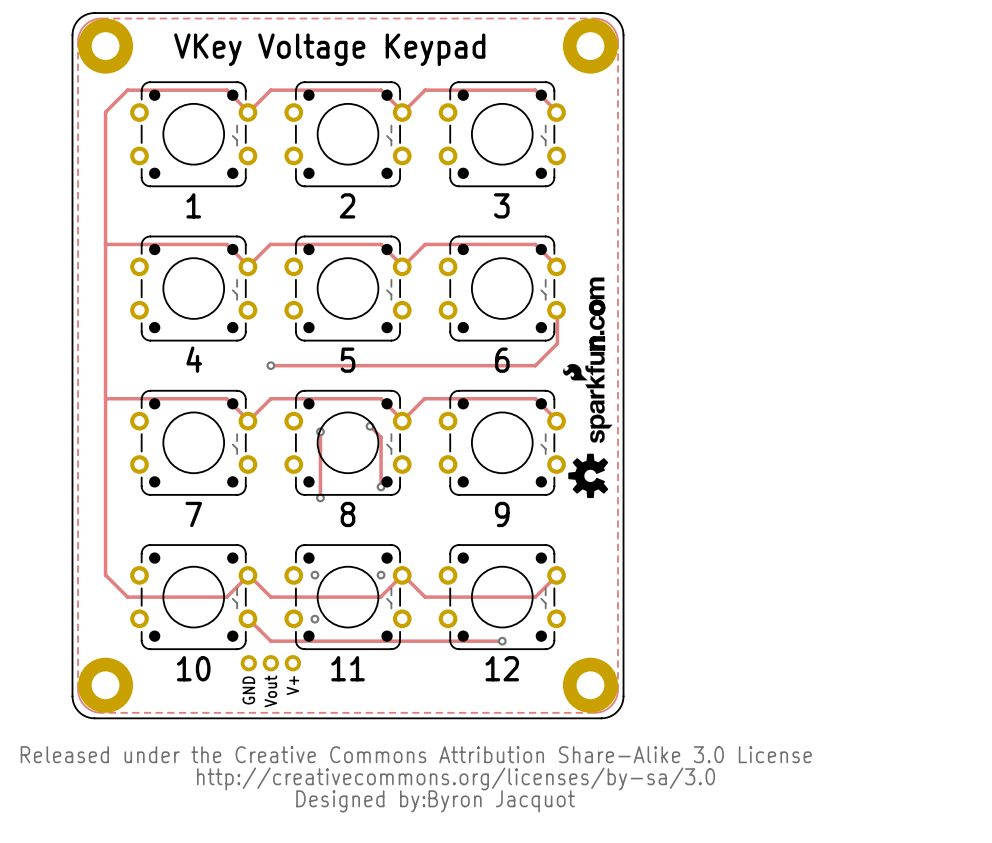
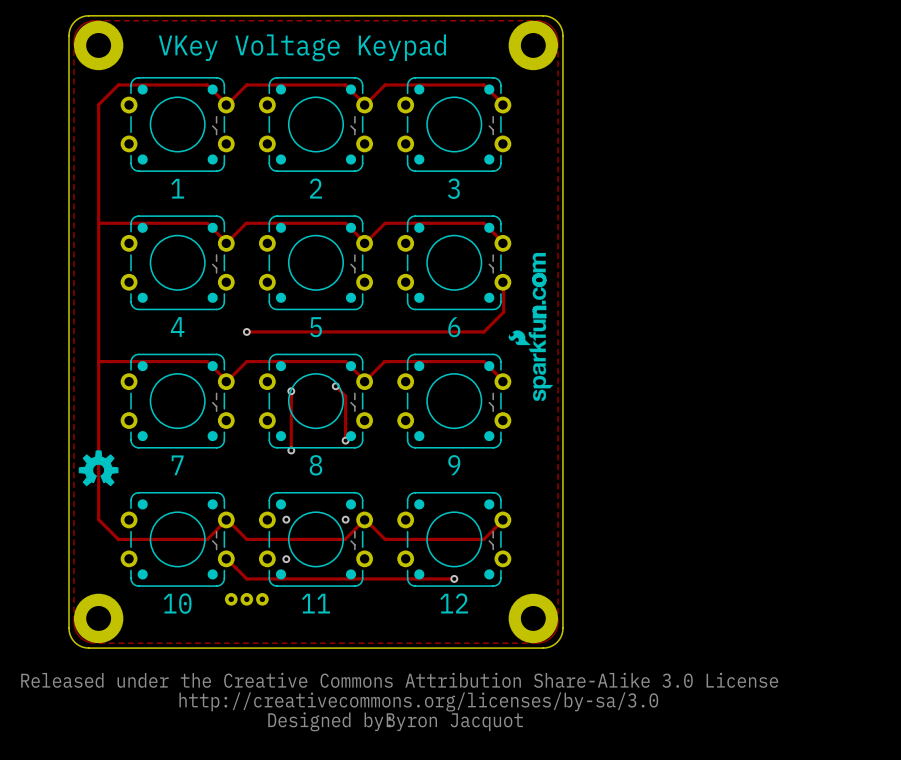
drawing: [568, 453, 609, 499] -> none
drawing: none -> [78, 450, 119, 487]
part footprint: [240, 655, 302, 672] -> [224, 592, 269, 606]
text: V+ (292, 685) -> none
text: GND (248, 690) -> none
text: Vout (270, 691) -> none

